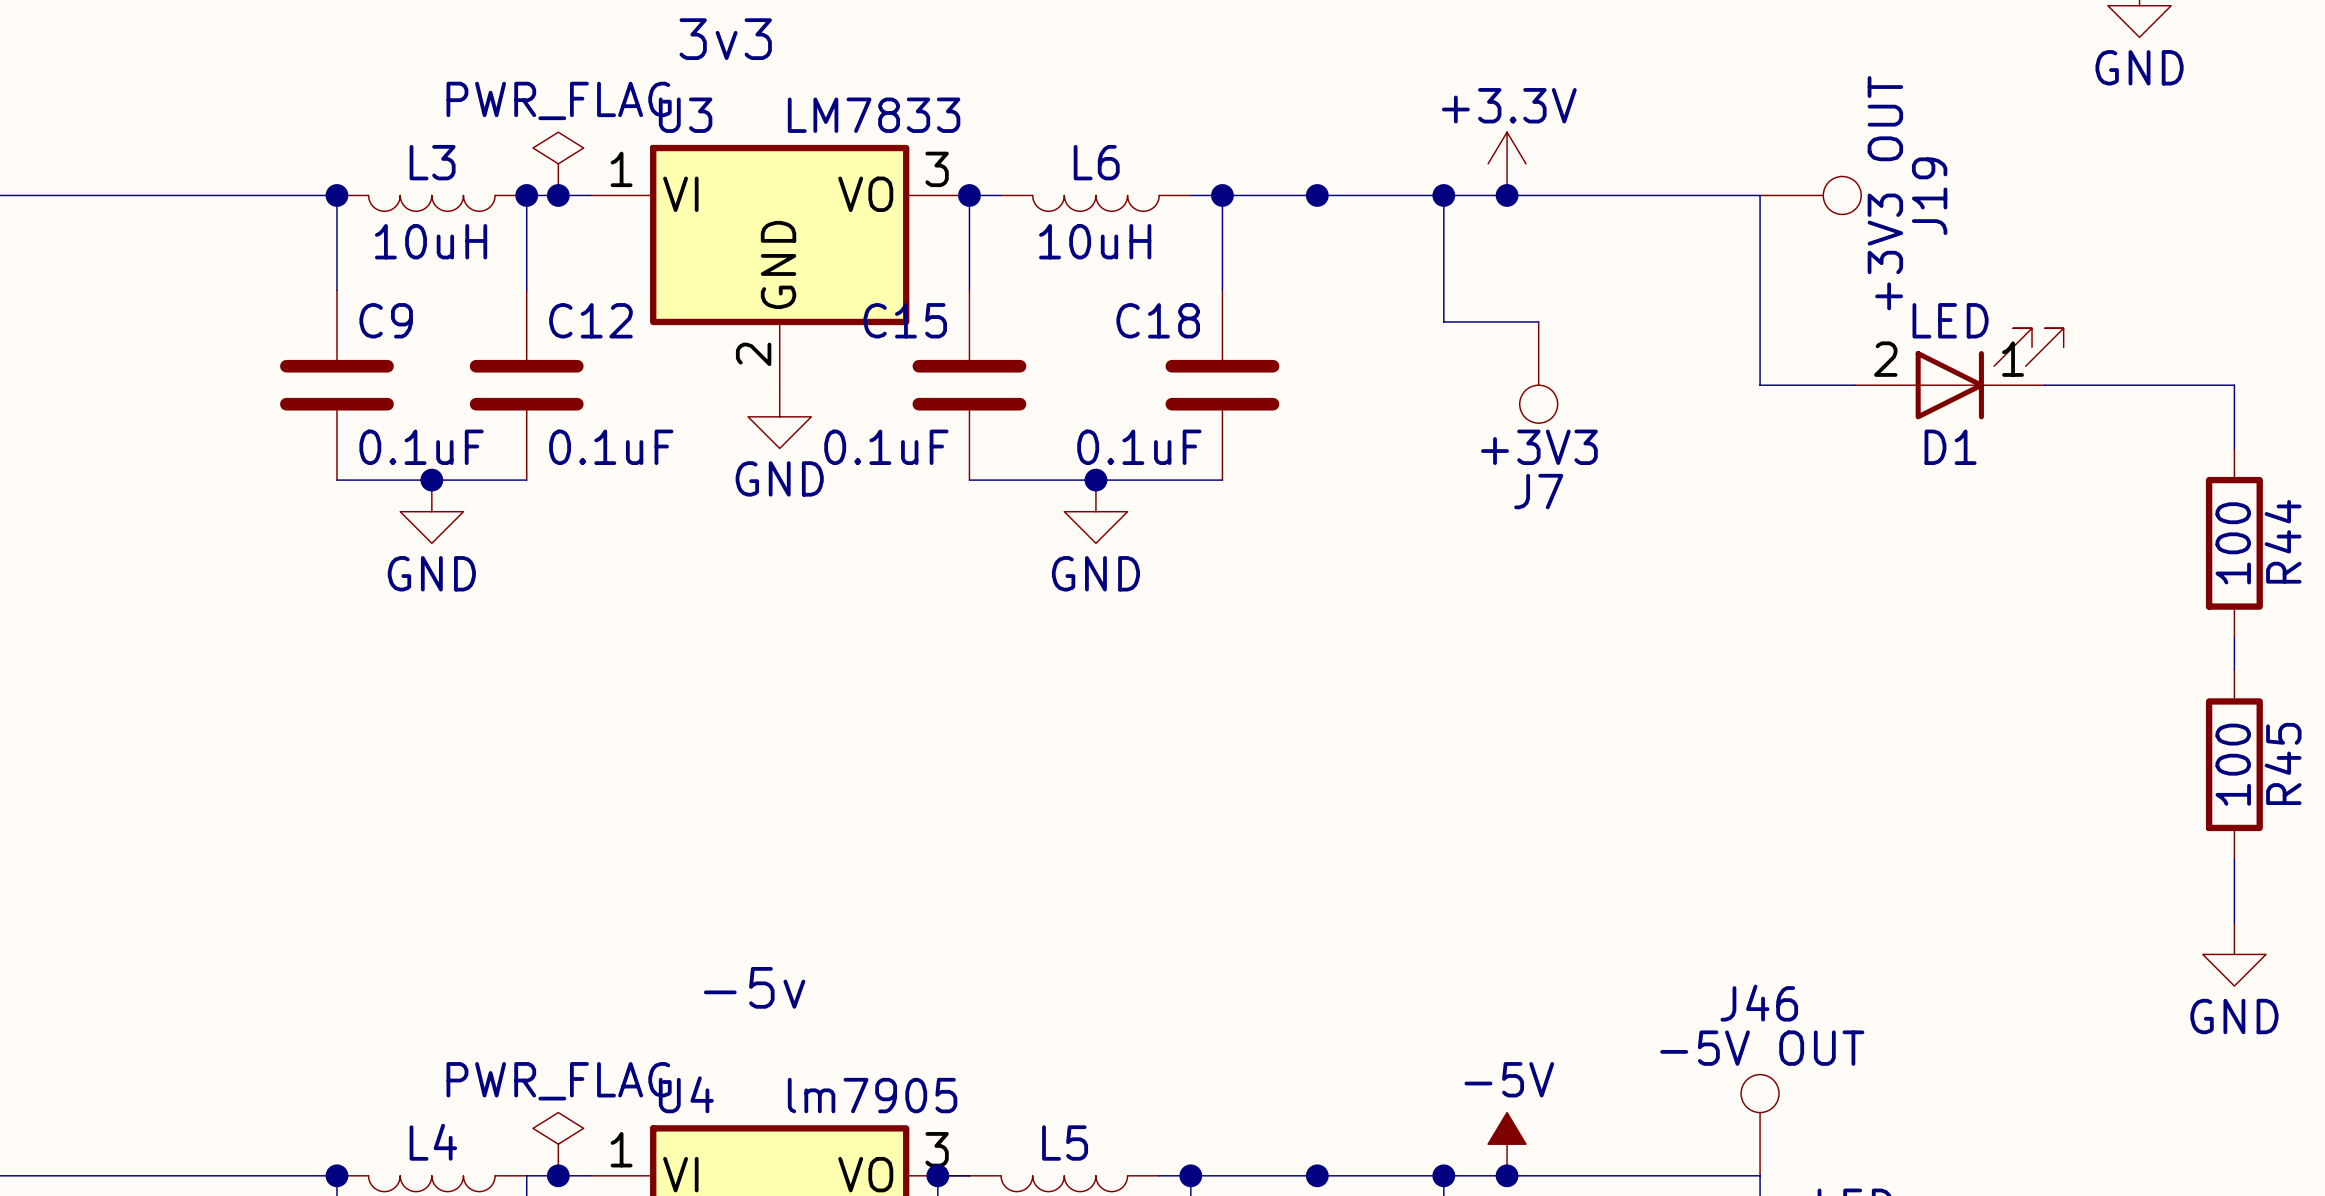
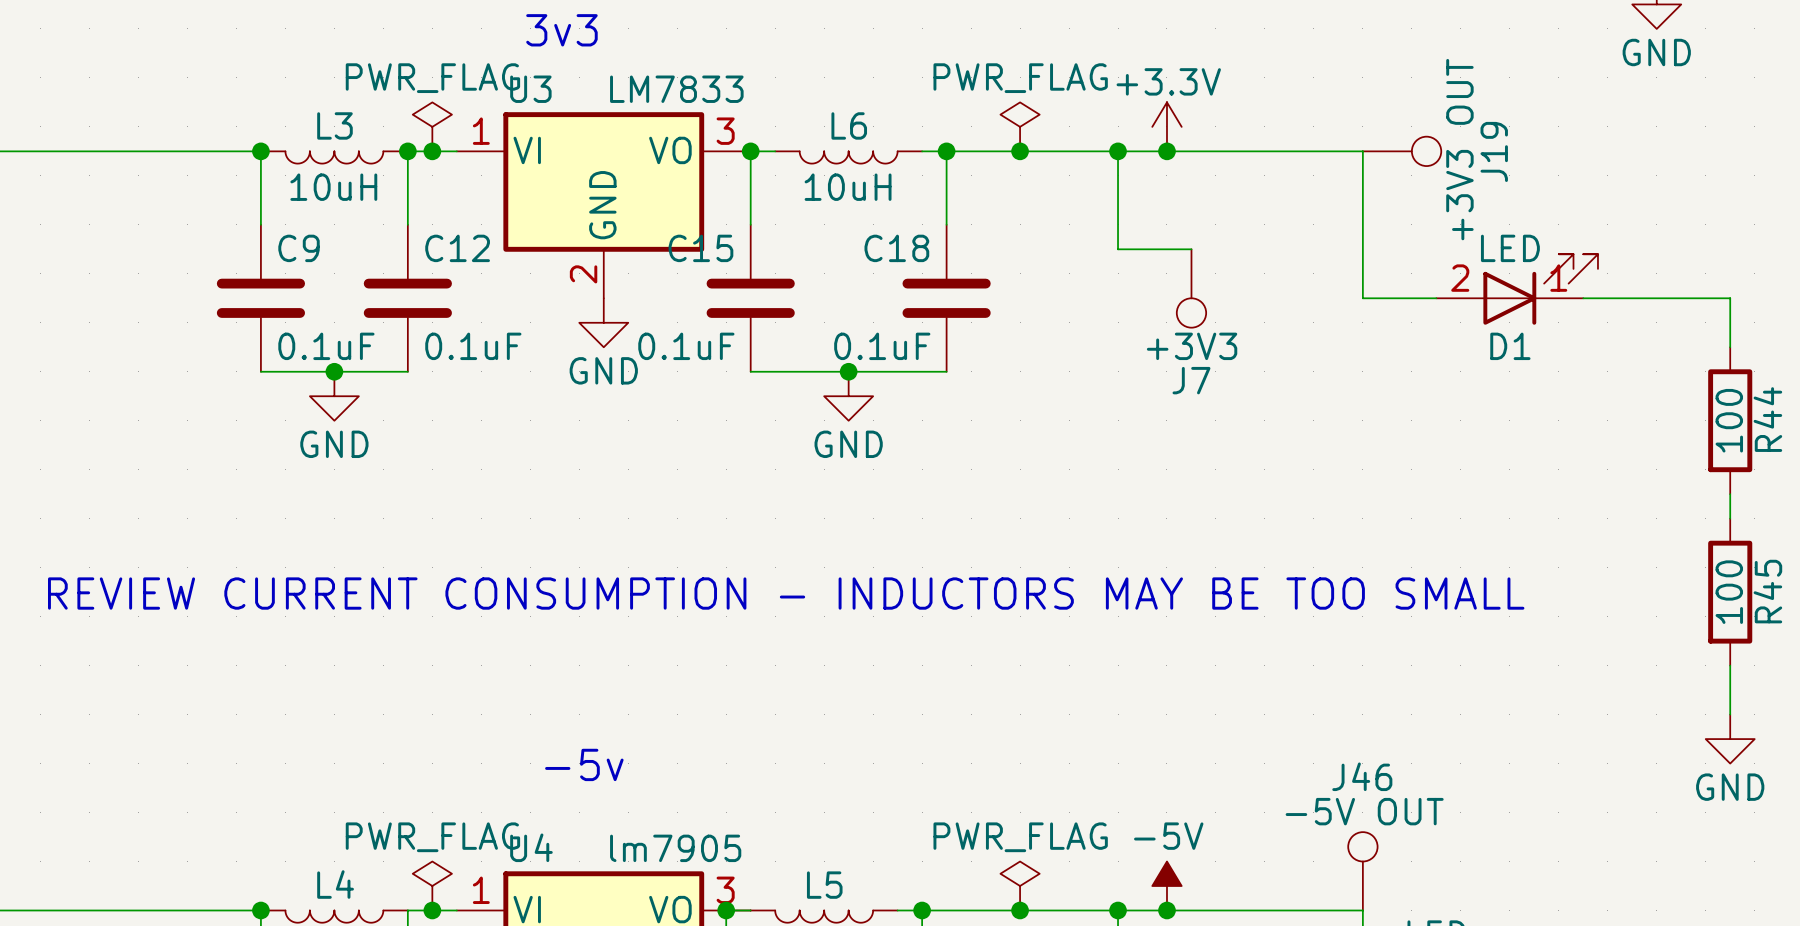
power symbol: none -> PWR_FLAG (1020, 126)
text: none -> REVIEW CURRENT CONSUMPTION - INDUCTORS MAY BE TOO SMALL (786, 593)
power symbol: none -> PWR_FLAG (1020, 886)

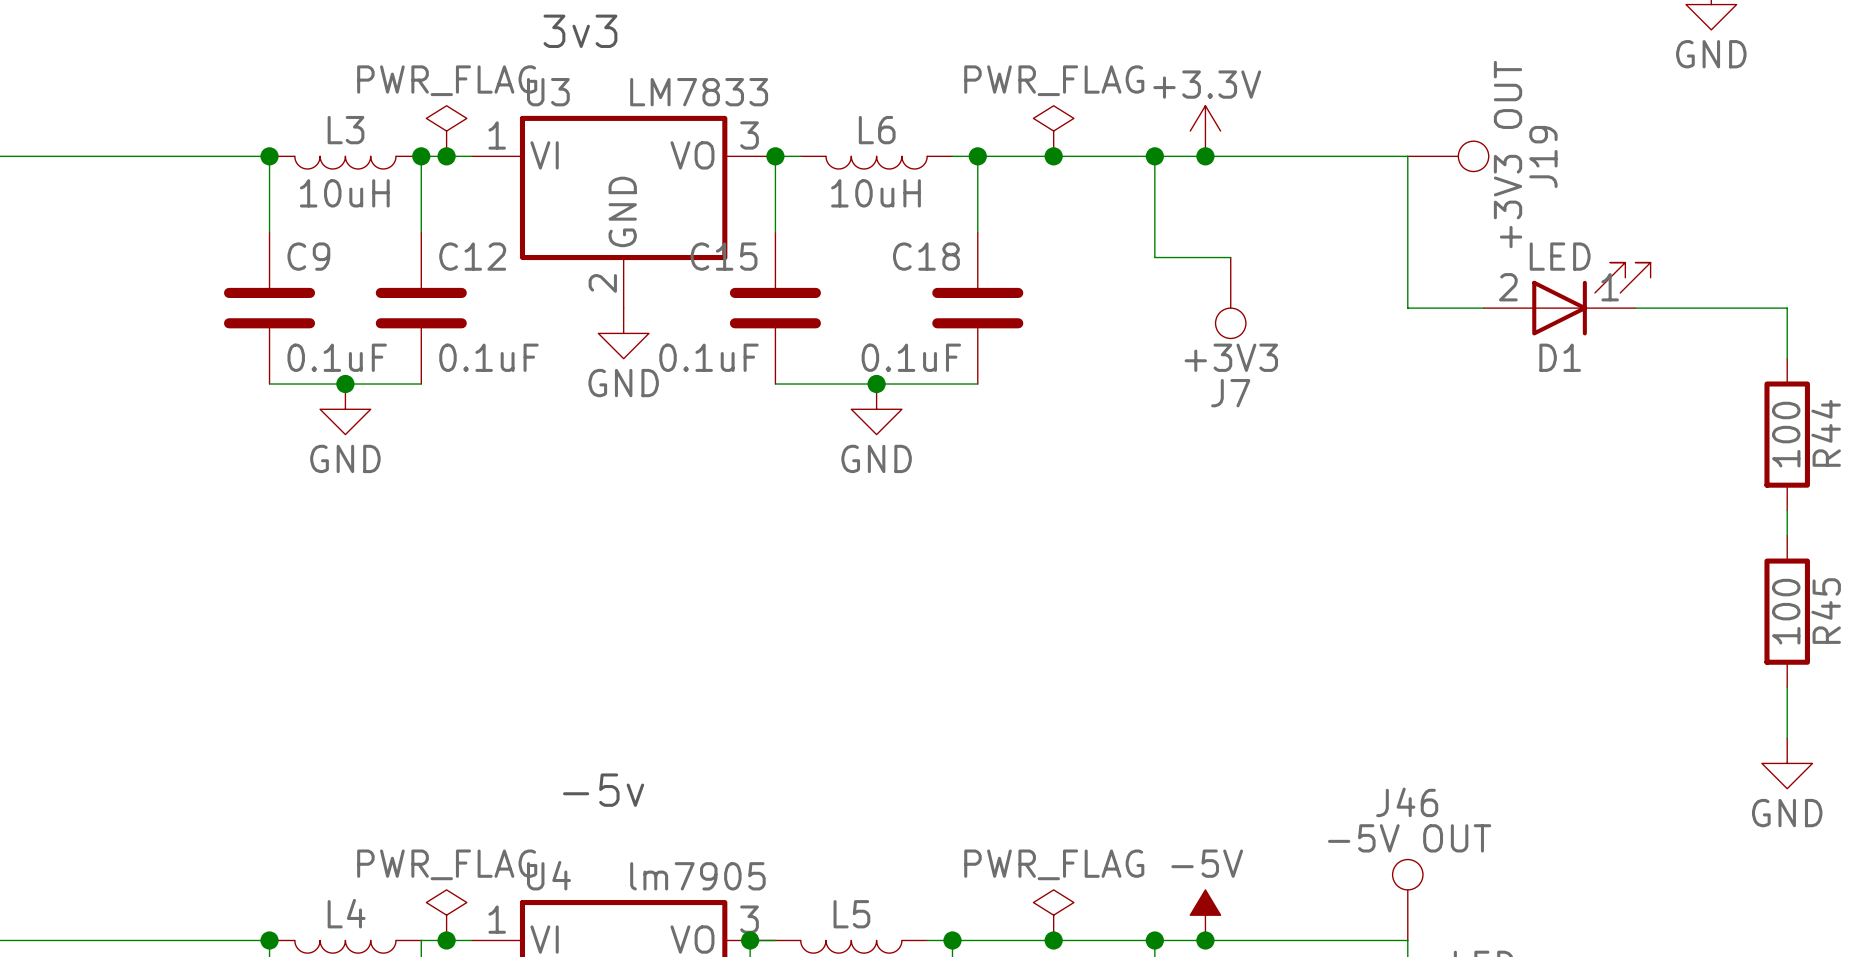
text: REVIEW CURRENT CONSUMPTION - INDUCTORS MAY BE TOO SMALL (786, 593) -> none

